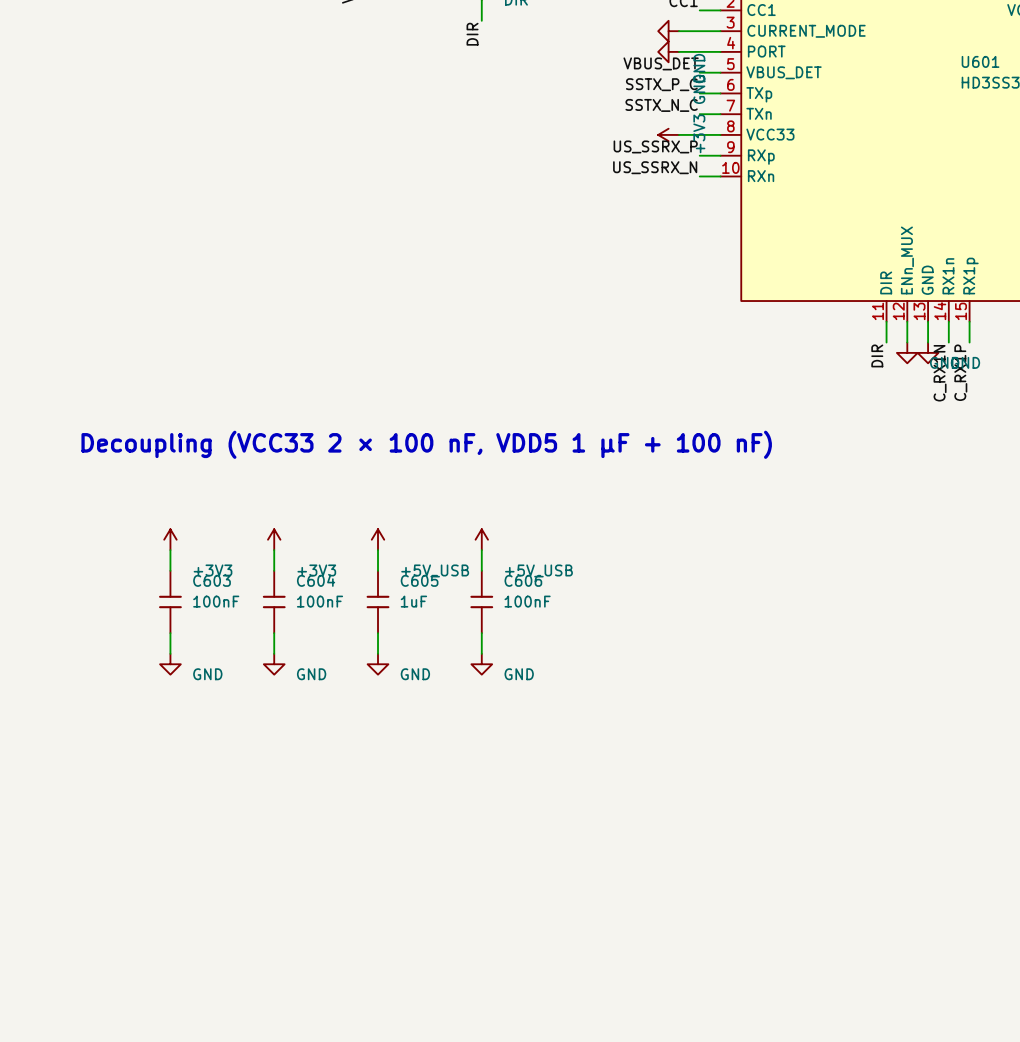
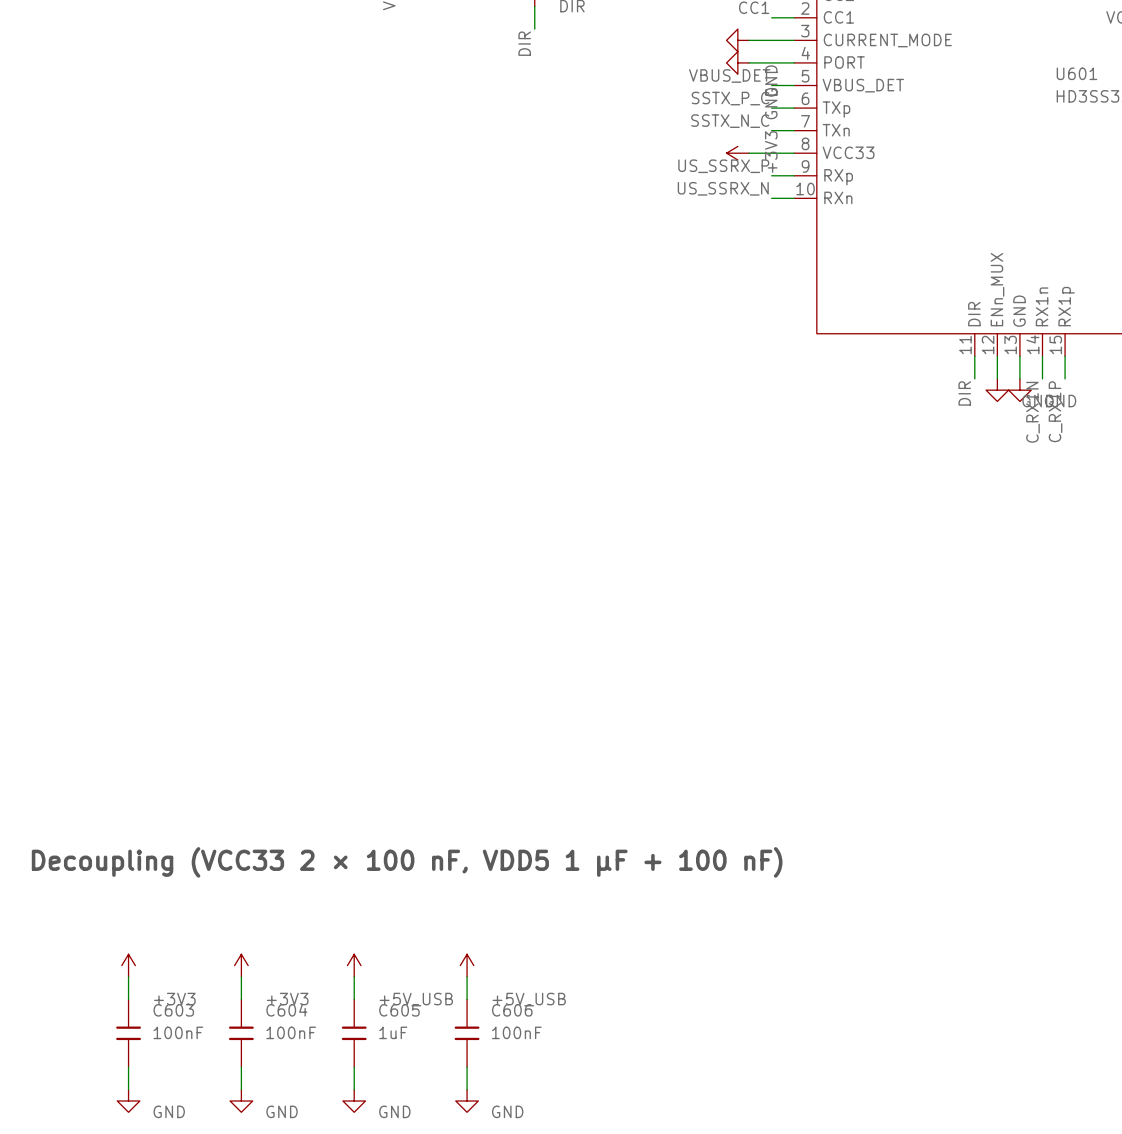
text: Decoupling (VCC33 2 × 100 nF, VDD5 1 µF + 100 nF) (426, 444) -> none
power symbol: +3V3 (170, 539) -> none
power symbol: +3V3 (274, 539) -> none
power symbol: +5V_USB (378, 539) -> none
power symbol: +5V_USB (481, 539) -> none
wire: (170, 550) (170, 570) -> none
wire: (274, 550) (274, 570) -> none
wire: (378, 550) (378, 570) -> none
wire: (481, 550) (481, 570) -> none
C603 position: (170, 601) -> (128, 1033)
C604 position: (274, 601) -> (241, 1033)
C605 position: (378, 601) -> (354, 1033)
C606 position: (481, 601) -> (467, 1033)
wire: (170, 633) (170, 653) -> none
wire: (274, 633) (274, 653) -> none
wire: (378, 633) (378, 653) -> none
wire: (481, 633) (481, 653) -> none
power symbol: GND (170, 664) -> none
power symbol: GND (274, 664) -> none
power symbol: GND (378, 664) -> none
power symbol: GND (481, 664) -> none
text: none -> Decoupling (VCC33 2 × 100 nF, VDD5 1 µF + 100 nF) (407, 862)
power symbol: none -> +3V3 (128, 965)
power symbol: none -> +3V3 (241, 965)
power symbol: none -> +5V_USB (354, 965)
power symbol: none -> +5V_USB (467, 965)
wire: none -> (128, 976) (128, 999)
wire: none -> (241, 976) (241, 999)
wire: none -> (354, 976) (354, 999)
wire: none -> (467, 976) (467, 999)
wire: none -> (128, 1067) (128, 1089)
wire: none -> (241, 1067) (241, 1089)
wire: none -> (354, 1067) (354, 1089)
wire: none -> (467, 1067) (467, 1089)
power symbol: none -> GND (128, 1101)
power symbol: none -> GND (241, 1101)
power symbol: none -> GND (354, 1101)
power symbol: none -> GND (467, 1101)

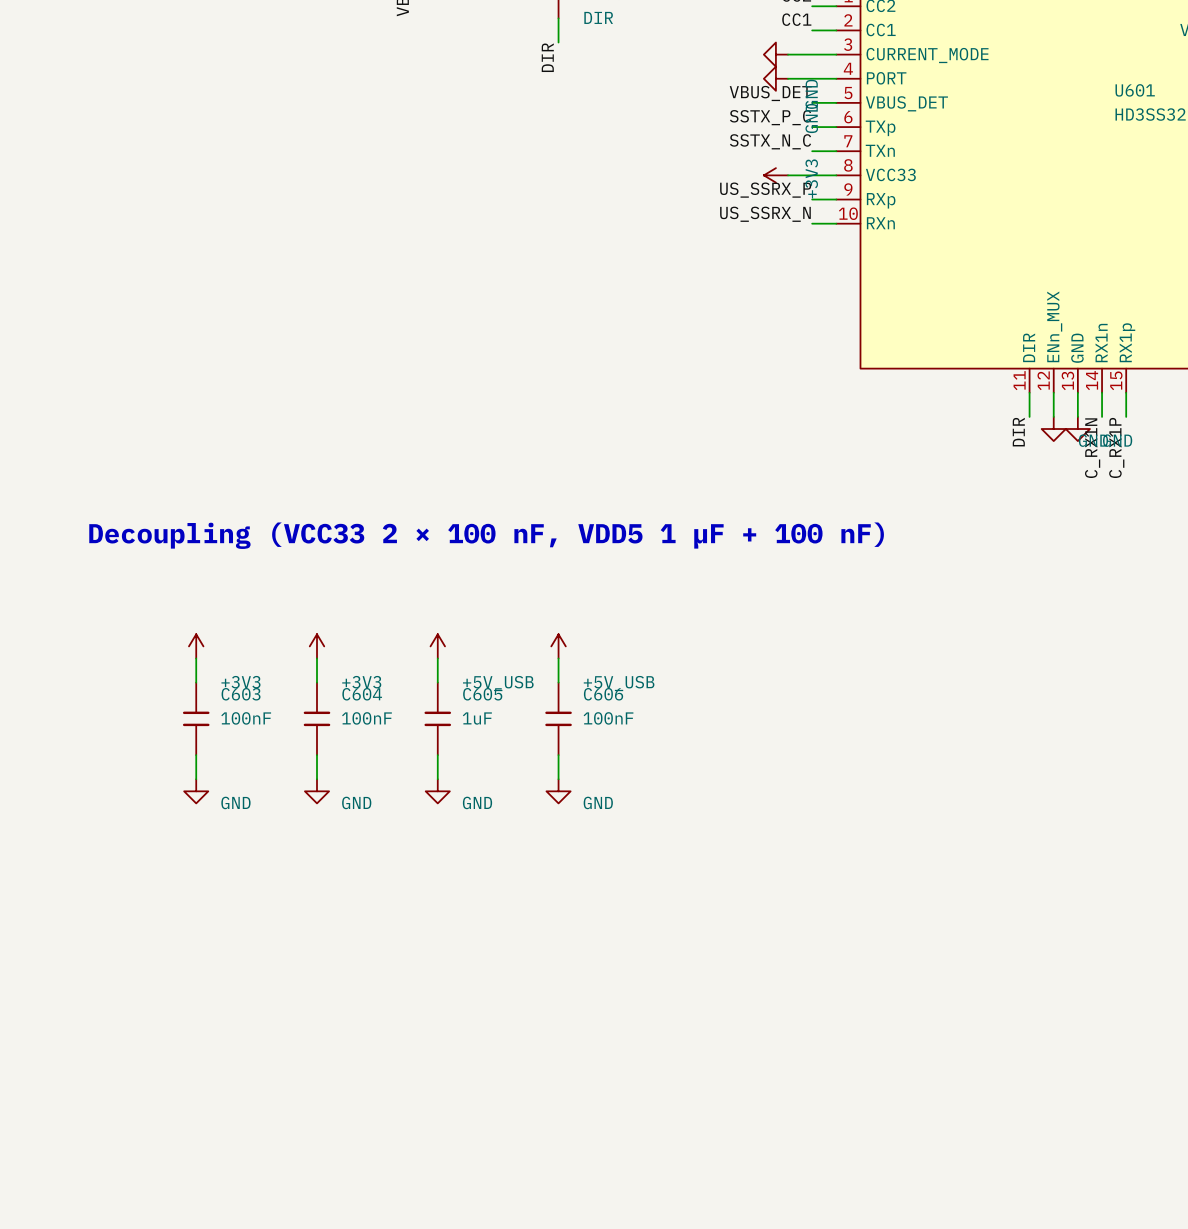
text: none -> Decoupling (VCC33 2 × 100 nF, VDD5 1 µF + 100 nF) (486, 535)
power symbol: none -> +3V3 (196, 646)
power symbol: none -> +3V3 (317, 646)
power symbol: none -> +5V_USB (437, 646)
power symbol: none -> +5V_USB (558, 646)
wire: none -> (196, 658) (196, 682)
wire: none -> (317, 658) (317, 682)
wire: none -> (437, 658) (437, 682)
wire: none -> (558, 658) (558, 682)
wire: none -> (196, 755) (196, 779)
wire: none -> (317, 755) (317, 779)
wire: none -> (437, 755) (437, 779)
wire: none -> (558, 755) (558, 779)
power symbol: none -> GND (196, 791)
power symbol: none -> GND (317, 791)
power symbol: none -> GND (437, 791)
power symbol: none -> GND (558, 791)
text: Decoupling (VCC33 2 × 100 nF, VDD5 1 µF + 100 nF) (407, 862) -> none
power symbol: +3V3 (128, 965) -> none
power symbol: +3V3 (241, 965) -> none
power symbol: +5V_USB (354, 965) -> none
power symbol: +5V_USB (467, 965) -> none
wire: (128, 976) (128, 999) -> none
wire: (241, 976) (241, 999) -> none
wire: (354, 976) (354, 999) -> none
wire: (467, 976) (467, 999) -> none
C603 position: (128, 1033) -> (196, 718)
C604 position: (241, 1033) -> (317, 718)
C605 position: (354, 1033) -> (437, 718)
C606 position: (467, 1033) -> (558, 718)
wire: (128, 1067) (128, 1089) -> none
wire: (241, 1067) (241, 1089) -> none
wire: (354, 1067) (354, 1089) -> none
wire: (467, 1067) (467, 1089) -> none
power symbol: GND (128, 1101) -> none
power symbol: GND (241, 1101) -> none
power symbol: GND (354, 1101) -> none
power symbol: GND (467, 1101) -> none

